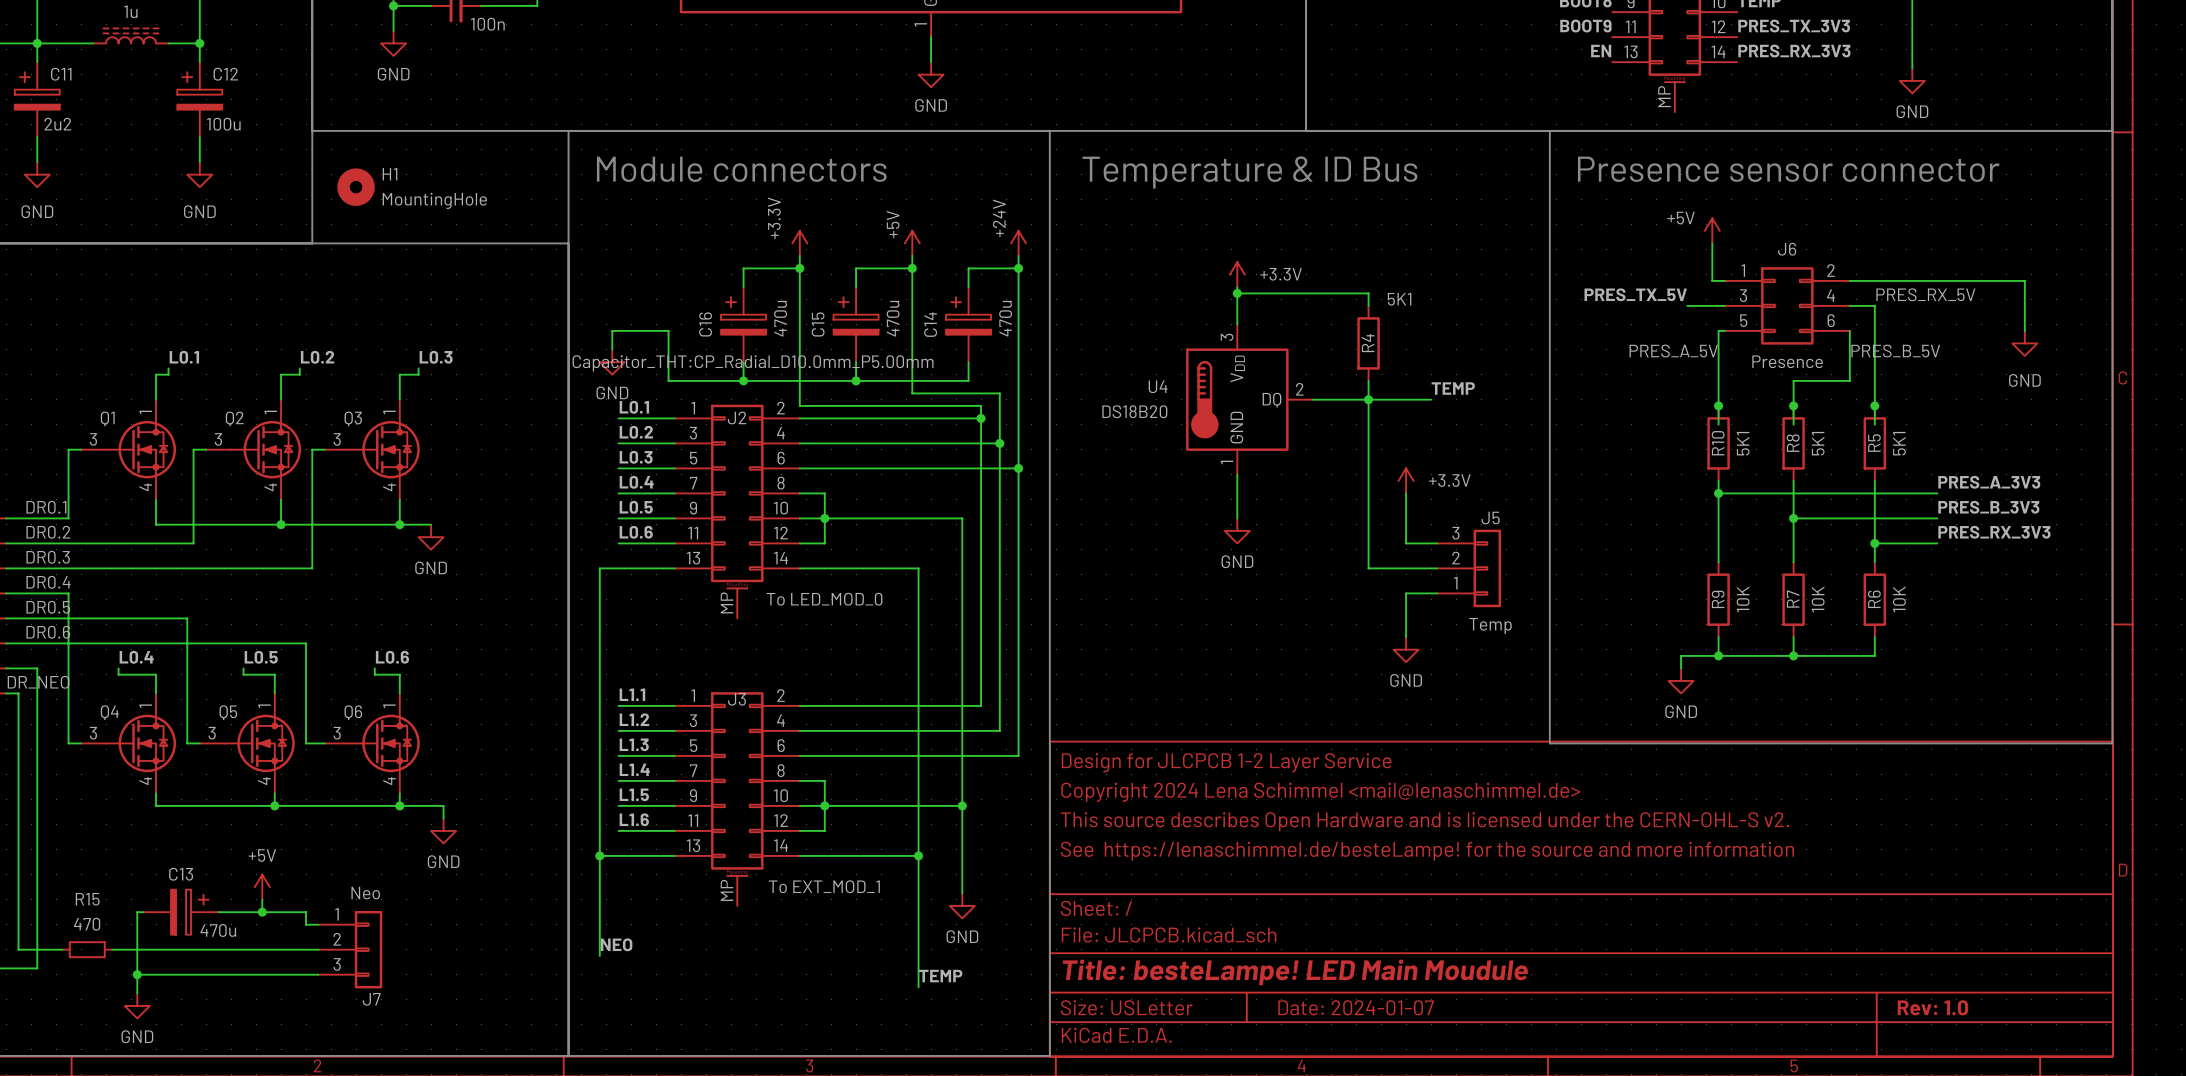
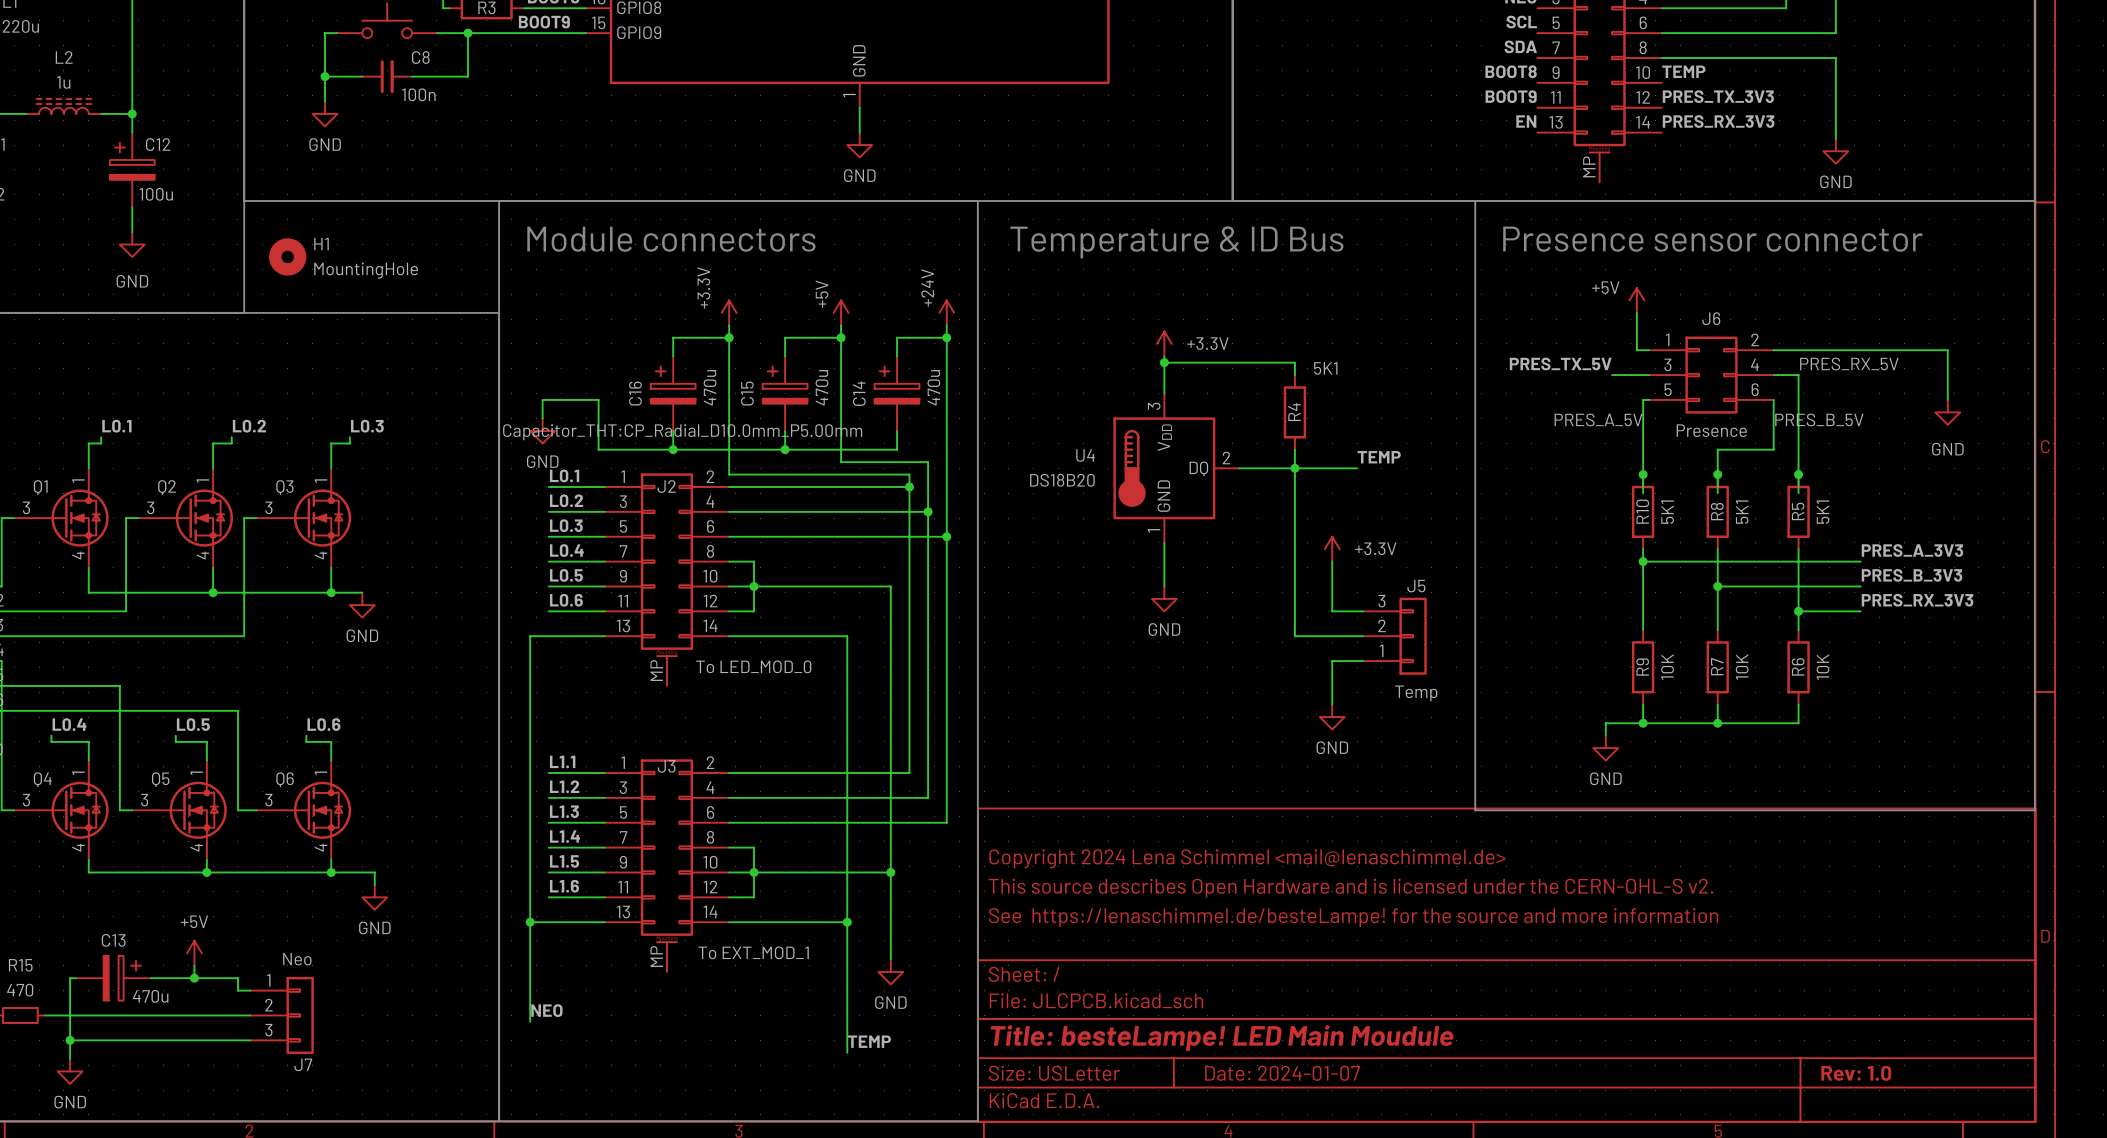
title block: Design for JLCPCB 1-2 Layer Service (1226, 762) -> none

